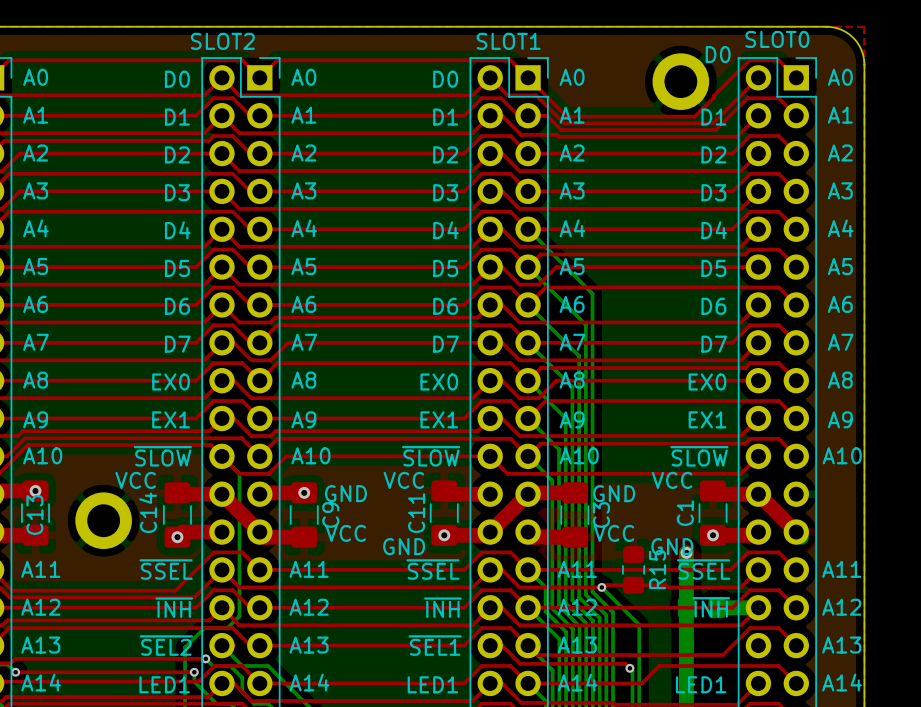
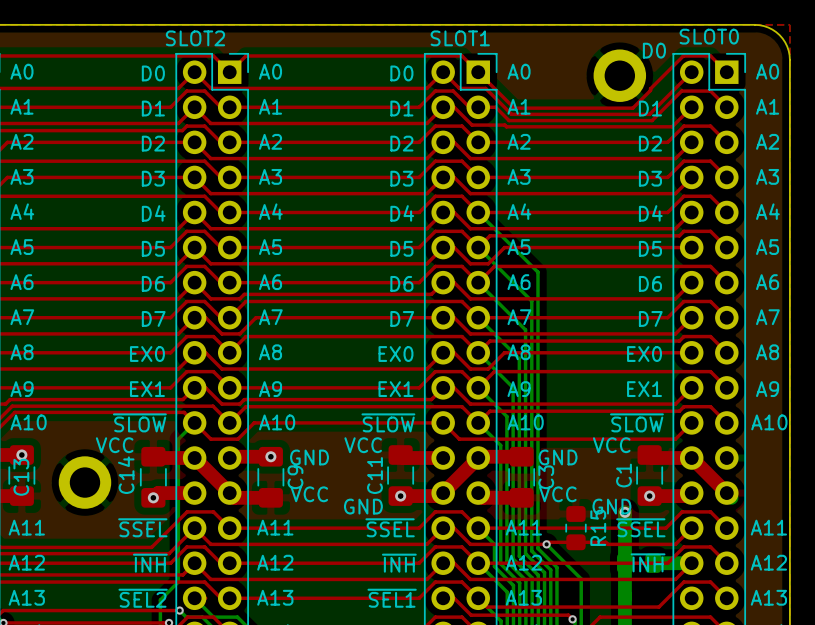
bottom track: (221, 456) (239, 473) (239, 616) (227, 628) (204, 628) -> (194, 422) (178, 439) (178, 582)

